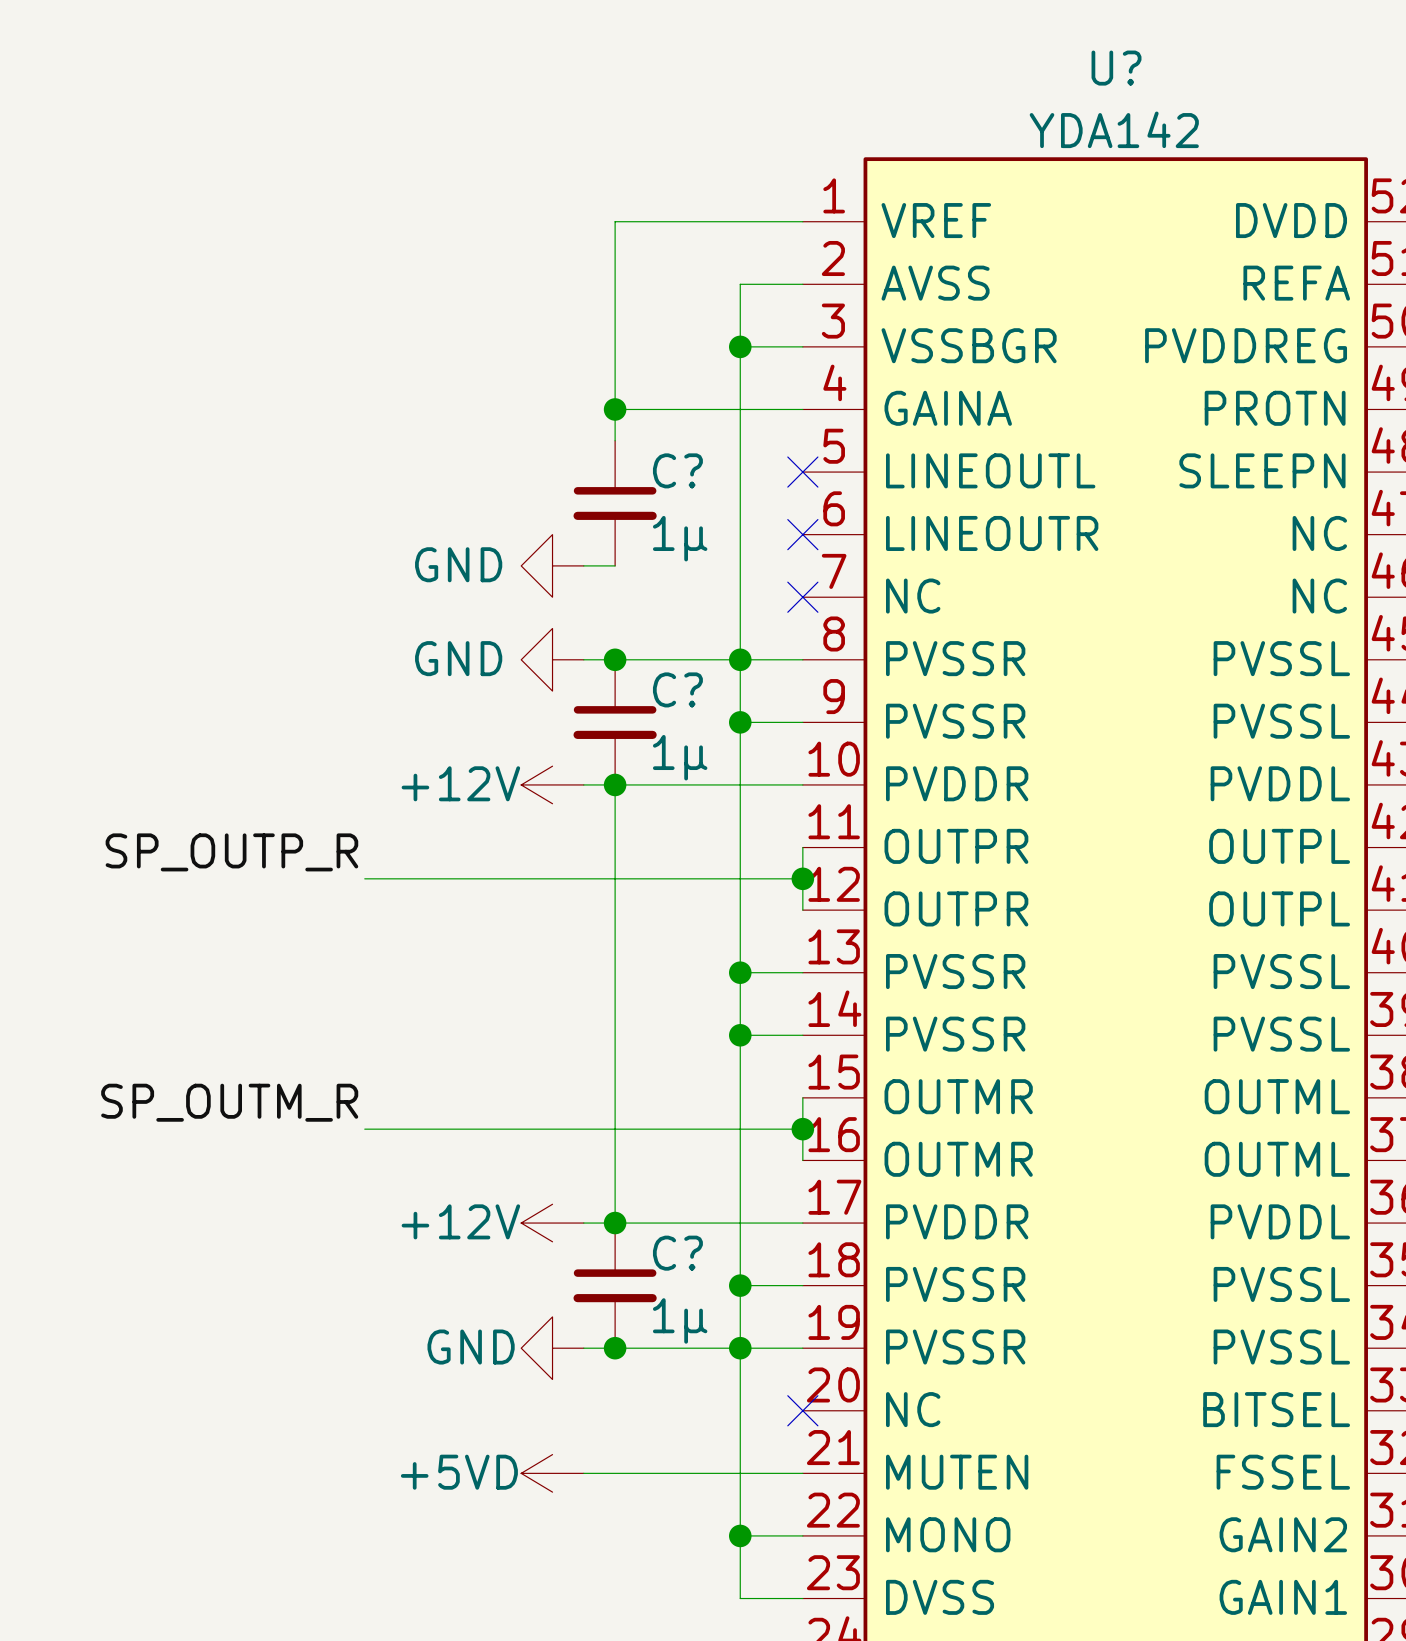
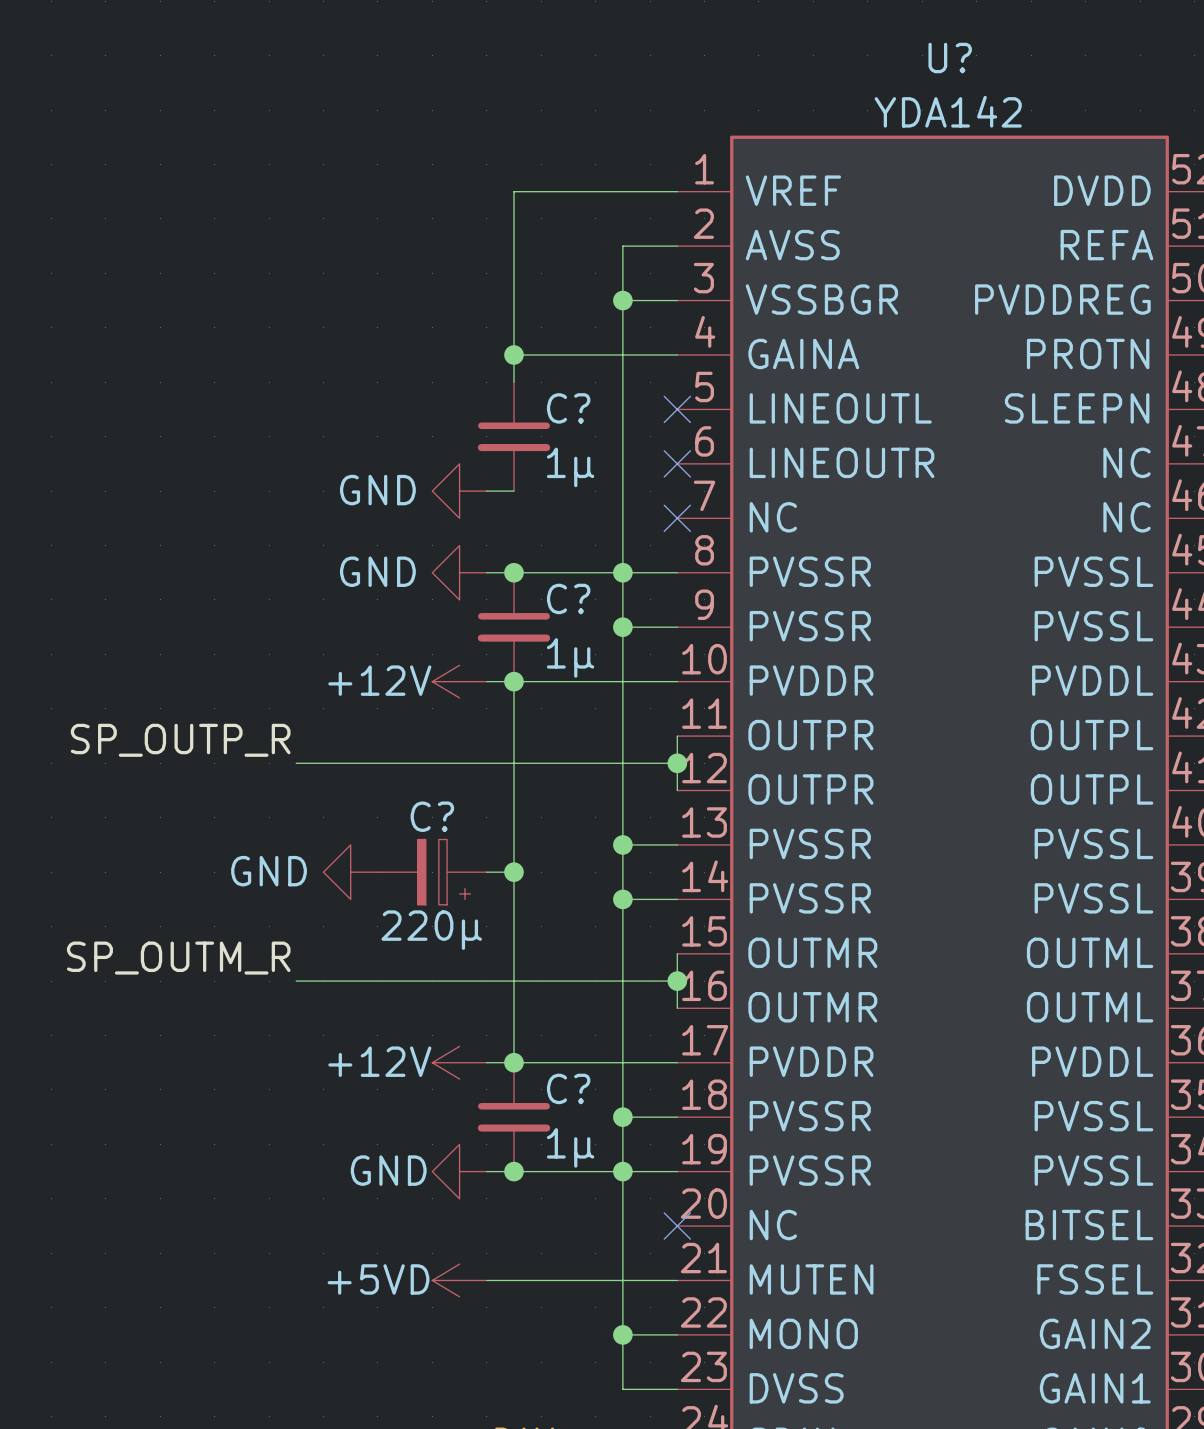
power symbol: none -> GND (350, 872)
C?: none -> 220μ (432, 872)
wire: none -> (486, 872) (514, 872)
junction: none -> (514, 872)

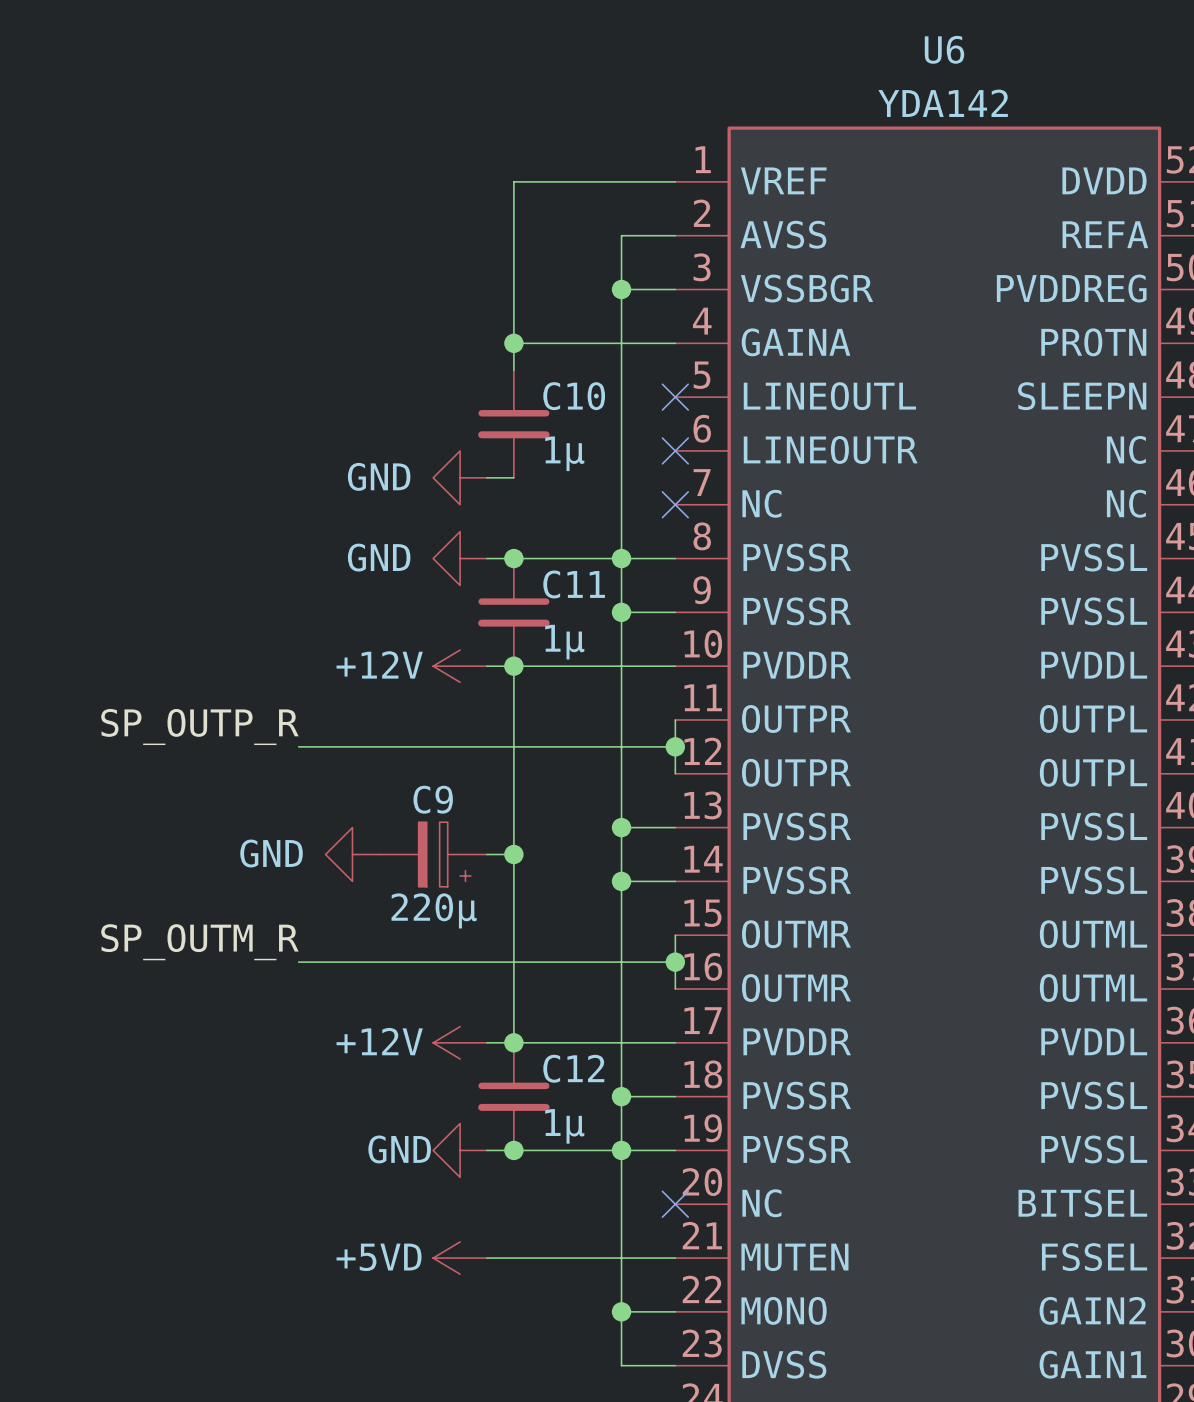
U? name: U? (950, 58) -> U6 (944, 49)
C? name: C? (568, 408) -> C10 (574, 396)
C? name: C? (568, 598) -> C11 (574, 584)
C? name: C? (432, 816) -> C9 (433, 799)
C? name: C? (568, 1088) -> C12 (573, 1068)

